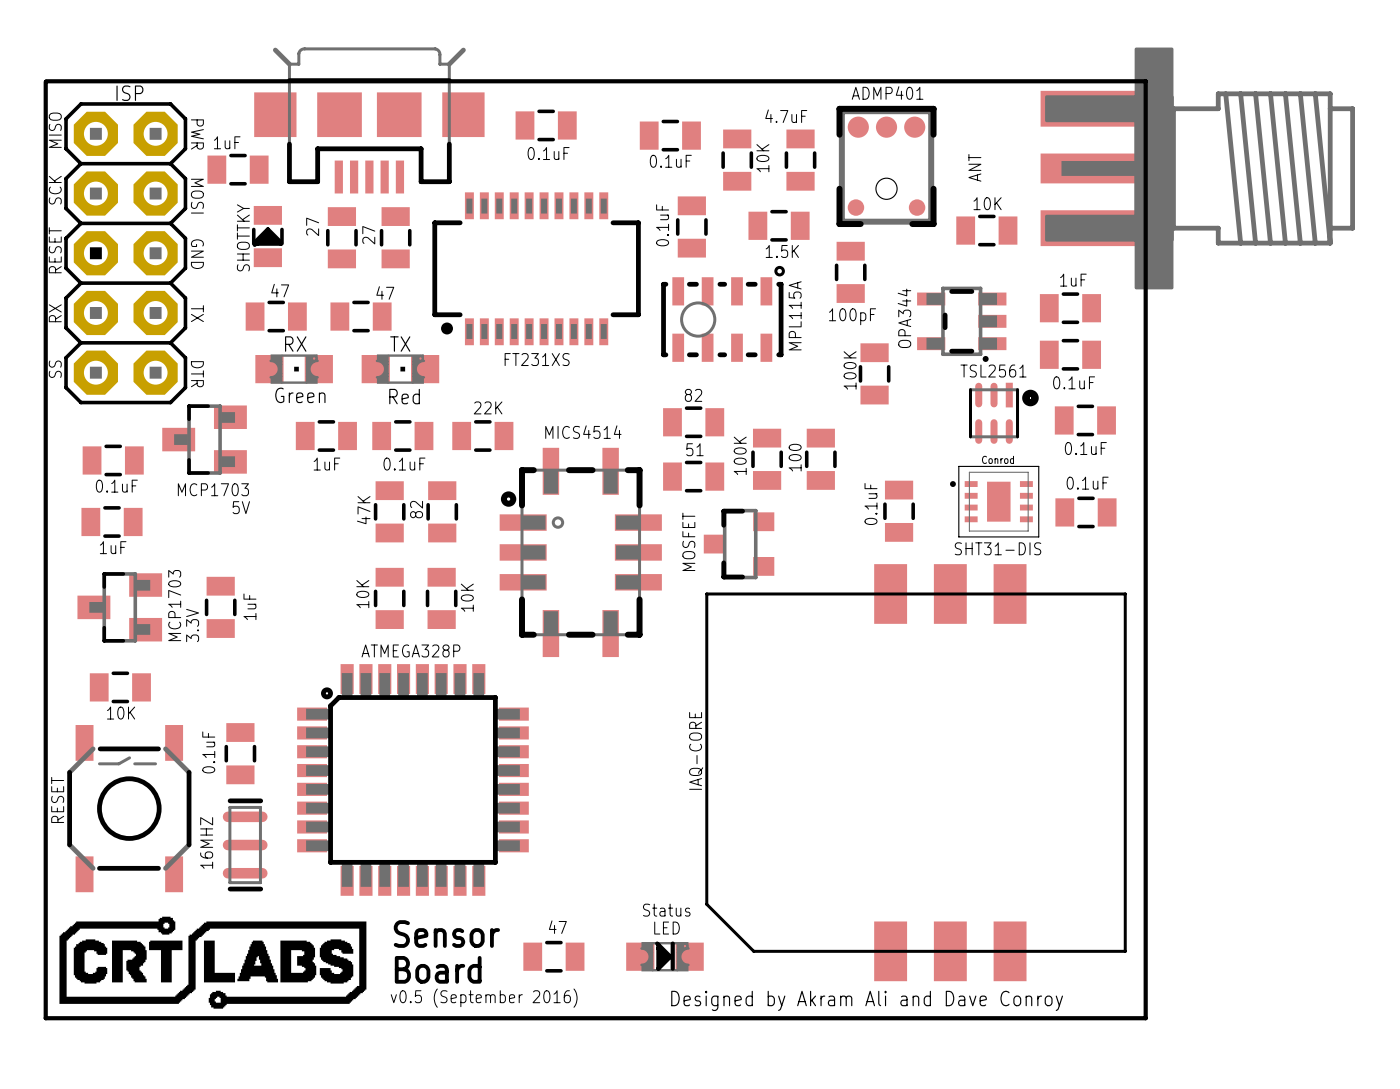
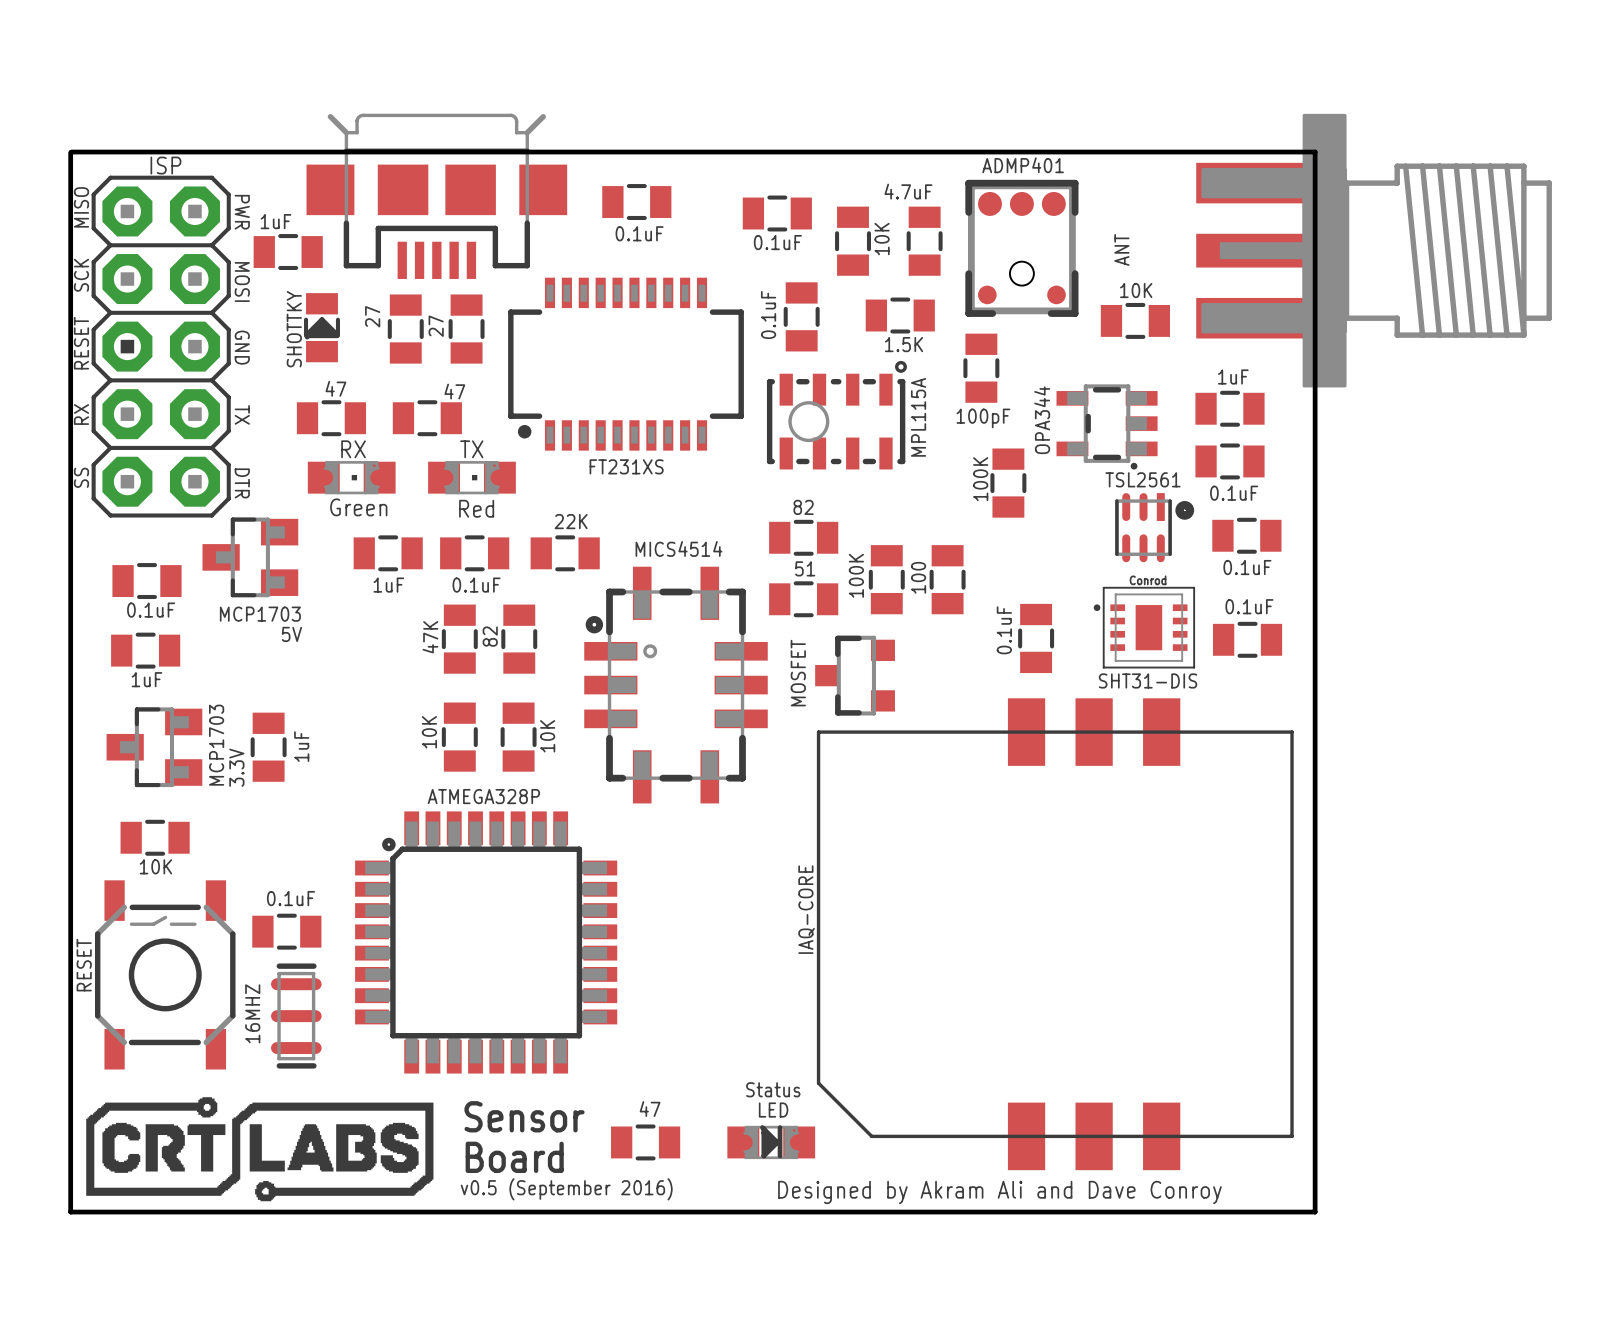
part rotation: 0° (240, 753) -> 90° clockwise (286, 931)

